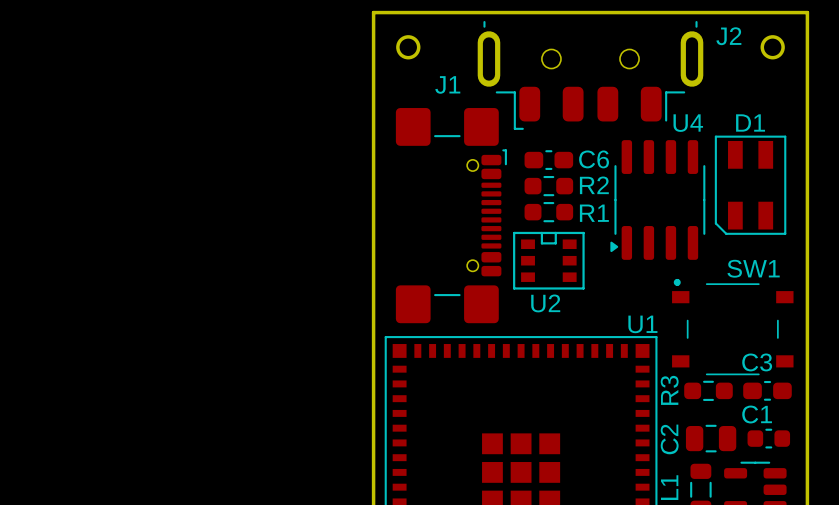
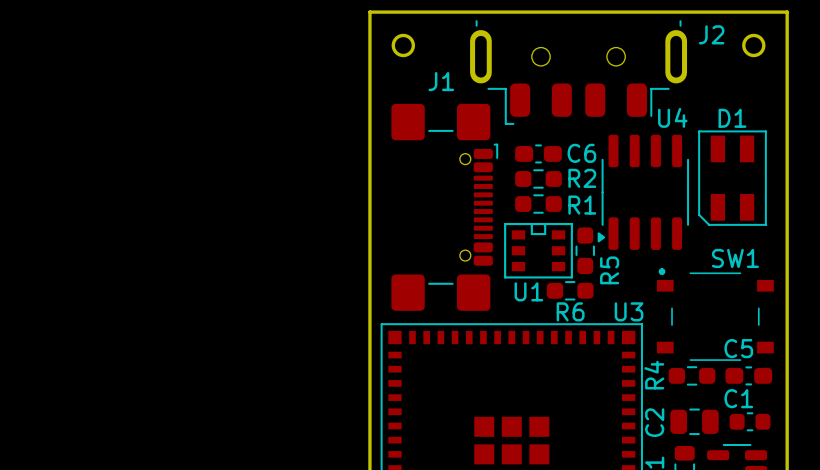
R5: none -> (585, 250)
R6: none -> (570, 290)
U2 name: U2 (545, 303) -> U1 (528, 291)
U1 name: U1 (642, 324) -> U3 (629, 311)
C3 name: C3 (757, 362) -> C5 (738, 348)
R3 name: R3 (669, 390) -> R4 (654, 375)

